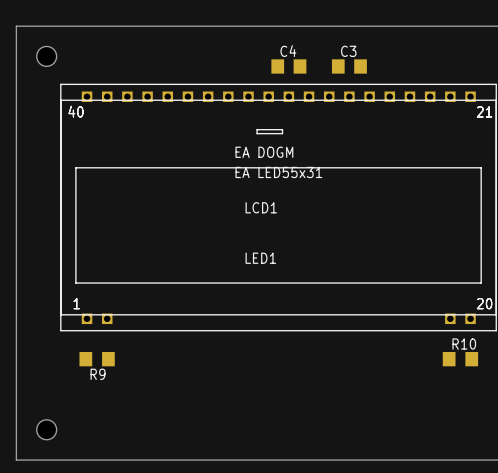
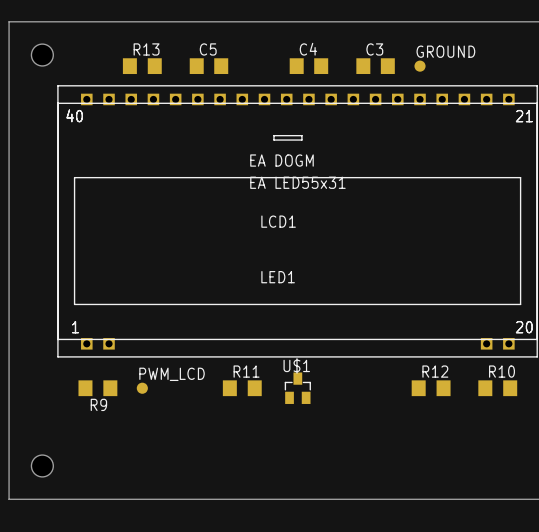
R13: none -> (142, 66)
C5: none -> (208, 66)
GROUND: none -> (420, 66)
PWM_LCD: none -> (142, 388)
R11: none -> (242, 388)
U$1: none -> (297, 388)
R12: none -> (431, 388)

